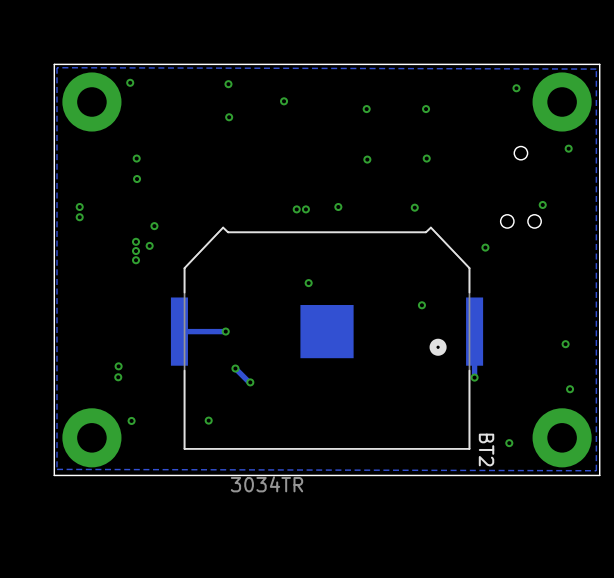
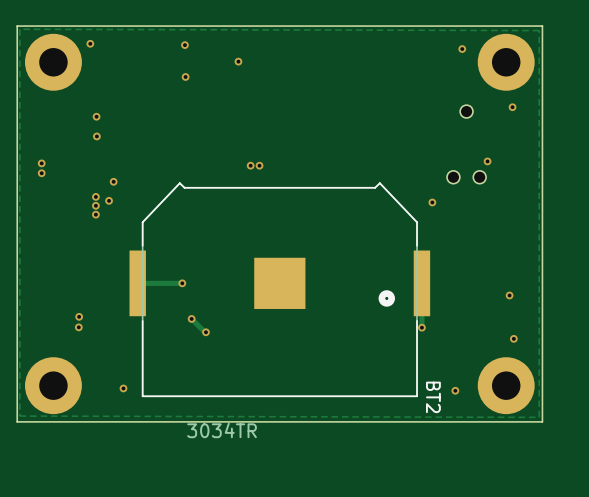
via: (366, 109) -> none
via: (426, 109) -> none
via: (426, 158) -> none
via: (367, 159) -> none
via: (338, 207) -> none
via: (414, 207) -> none
via: (308, 283) -> none
via: (421, 305) -> none
via: (131, 420) -> none
via: (208, 420) -> none
via: none -> (123, 388)

